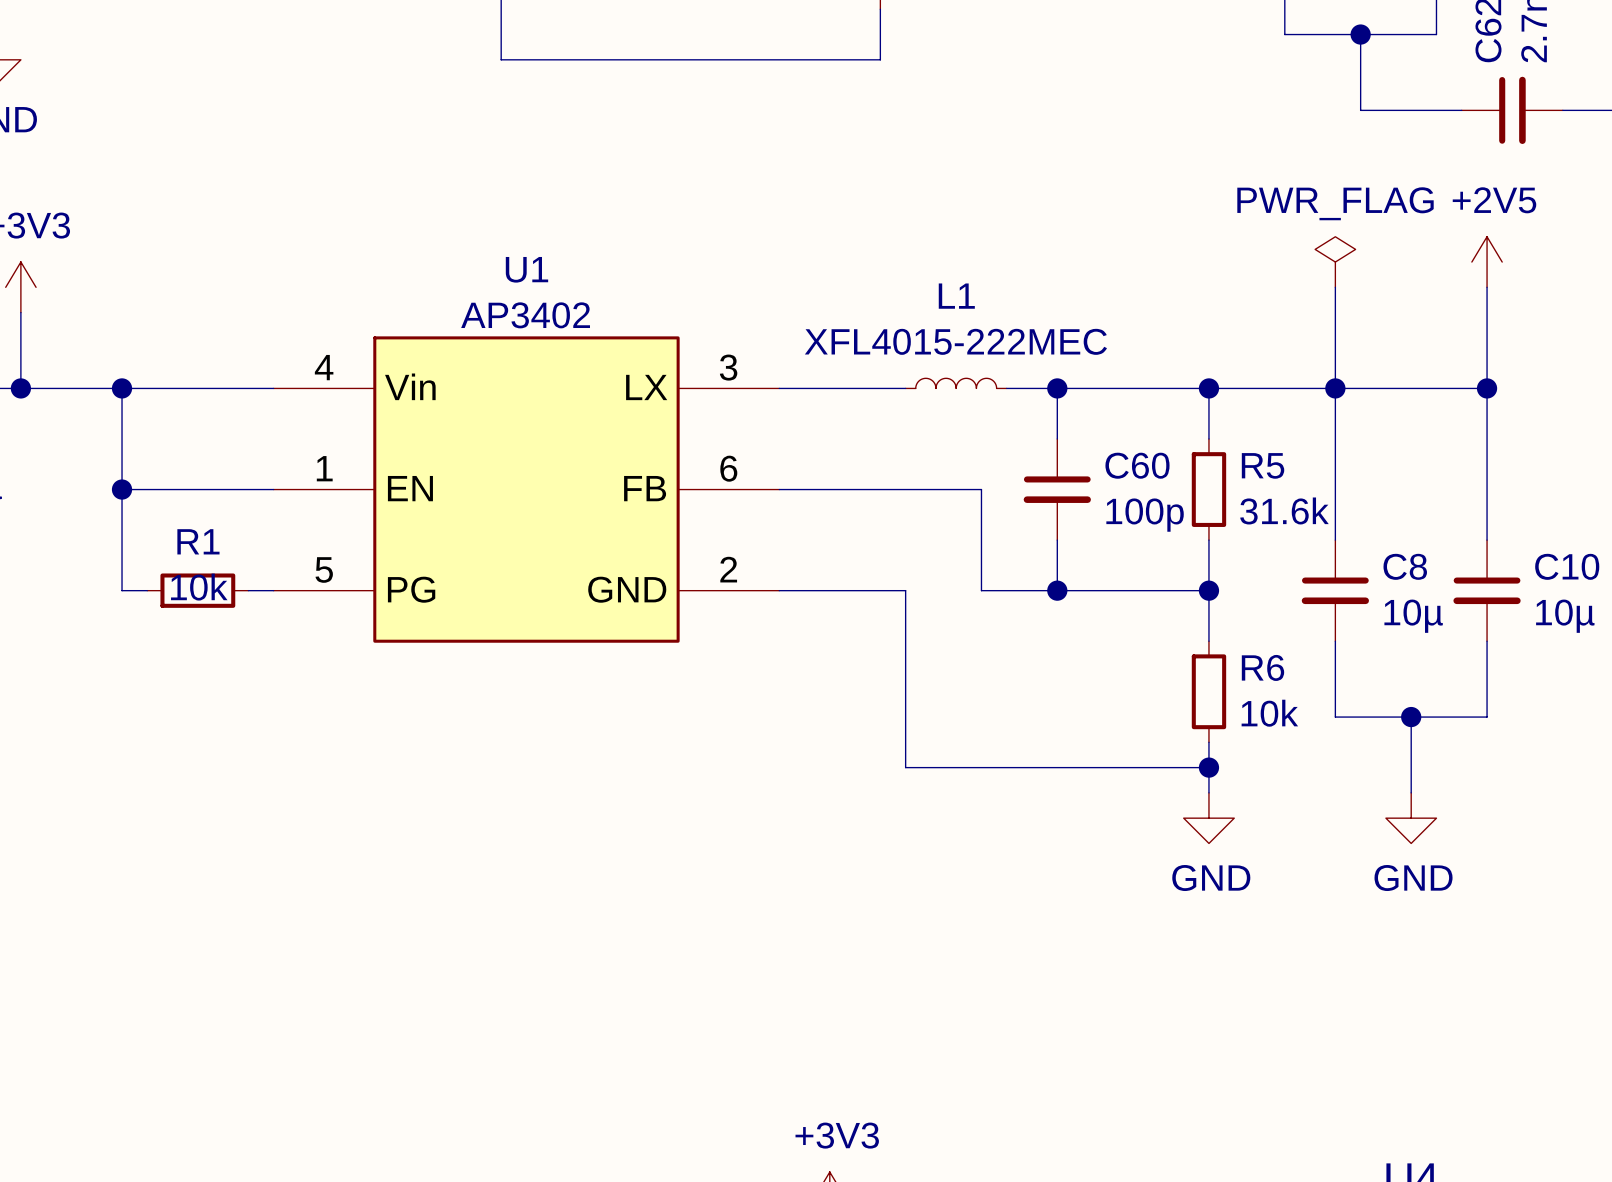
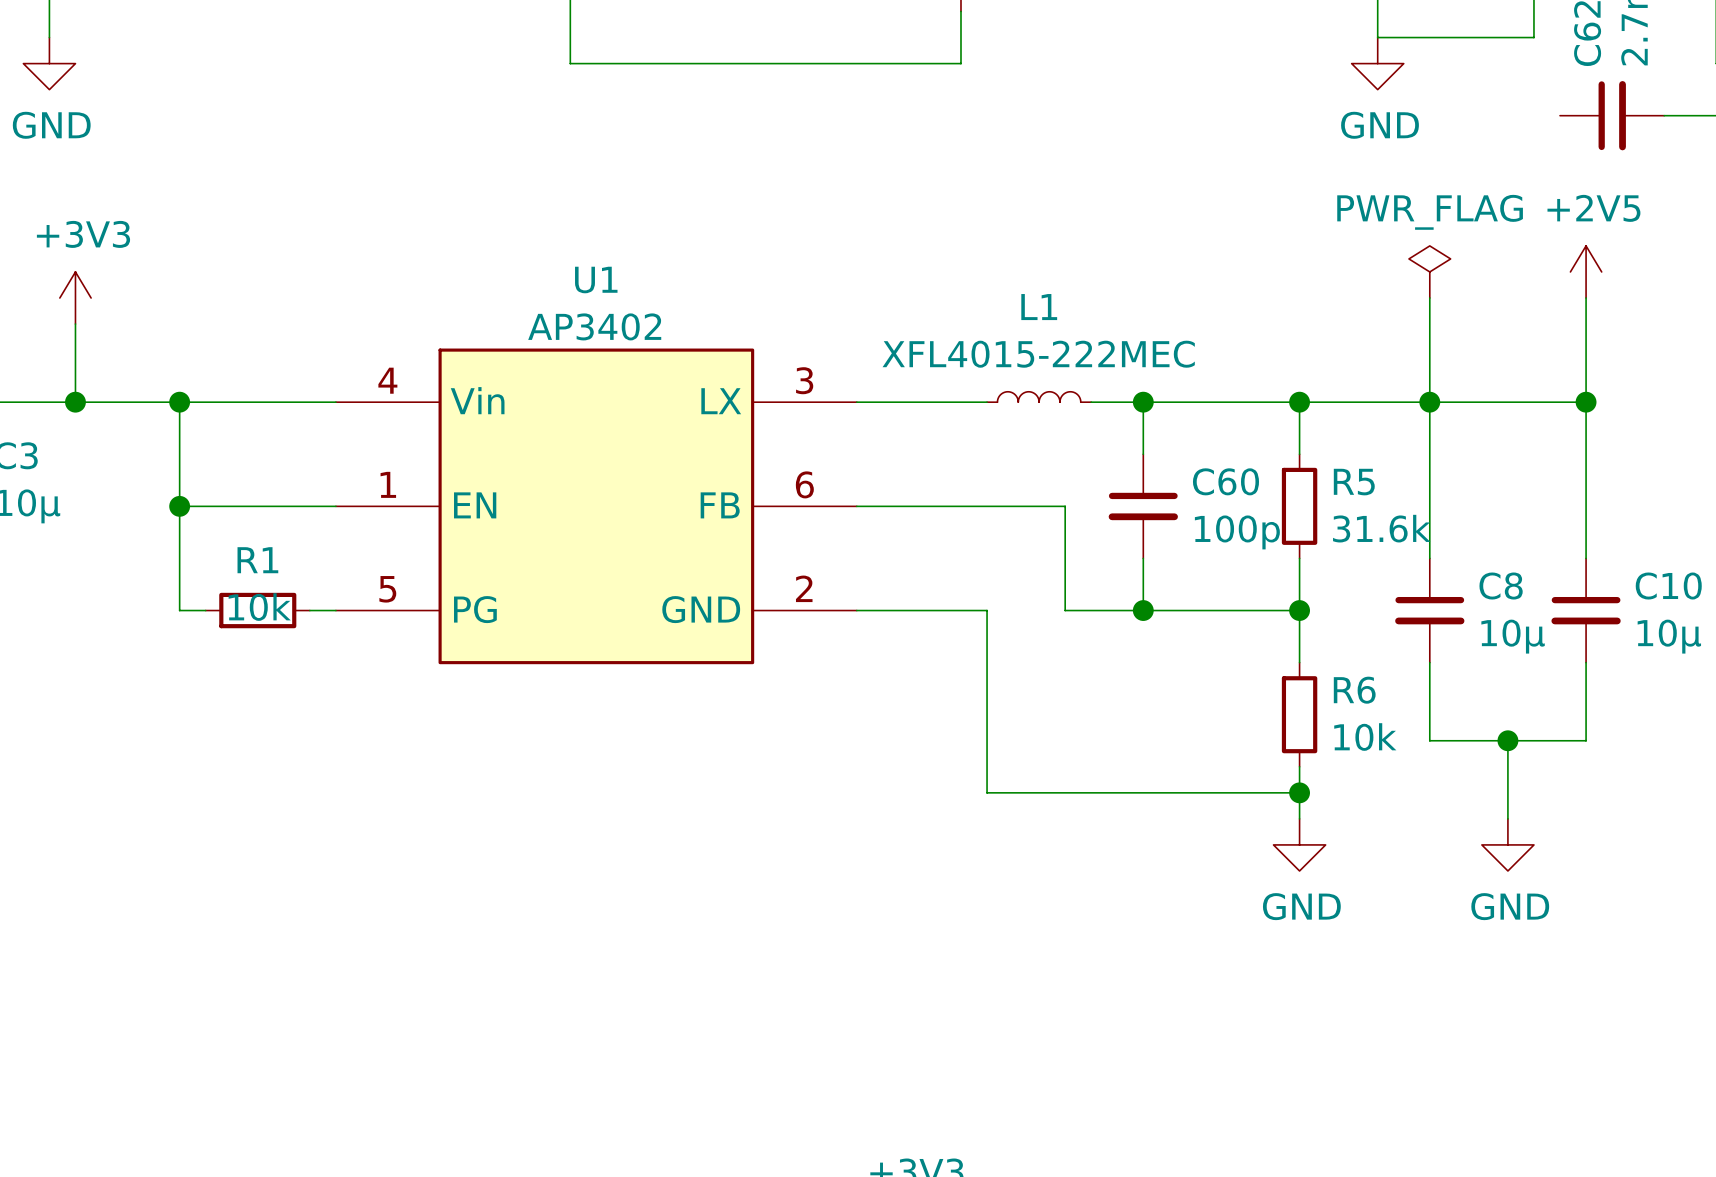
wire: (1360, 34) (1360, 110) (1461, 110) -> none
junction: (1360, 34) -> none
power symbol: none -> GND (1377, 63)

